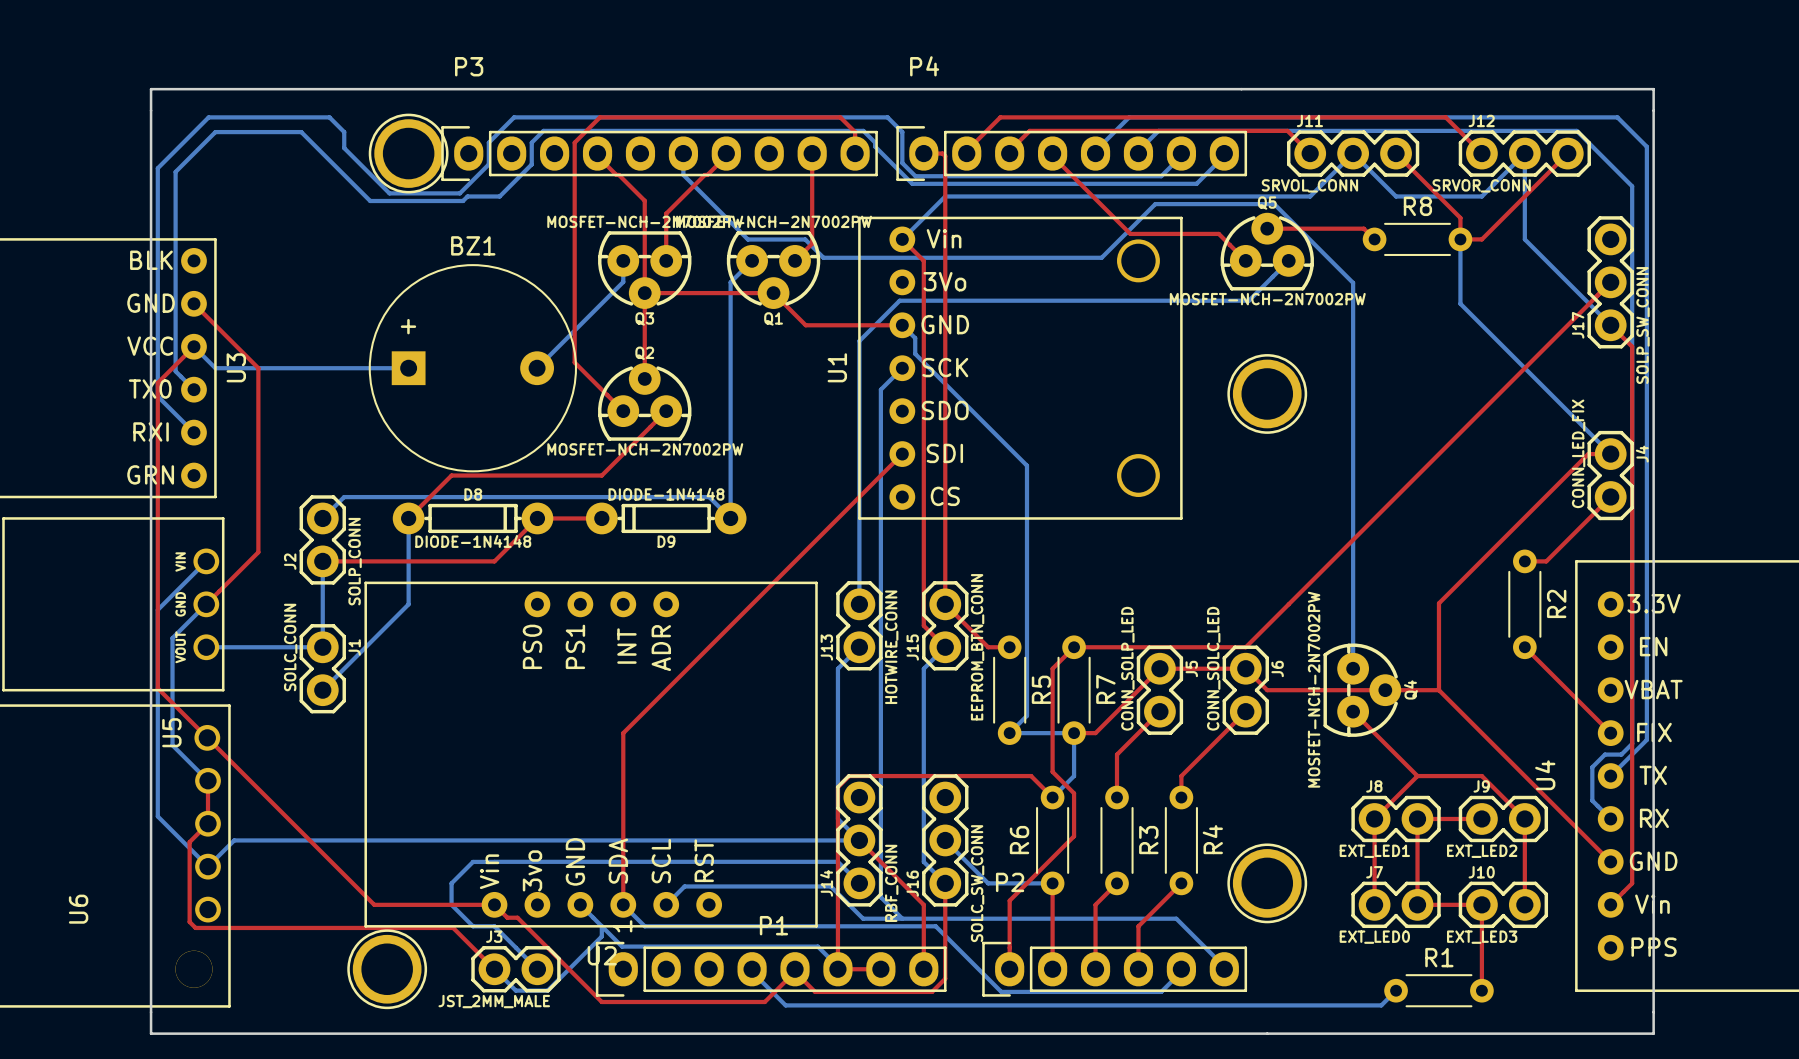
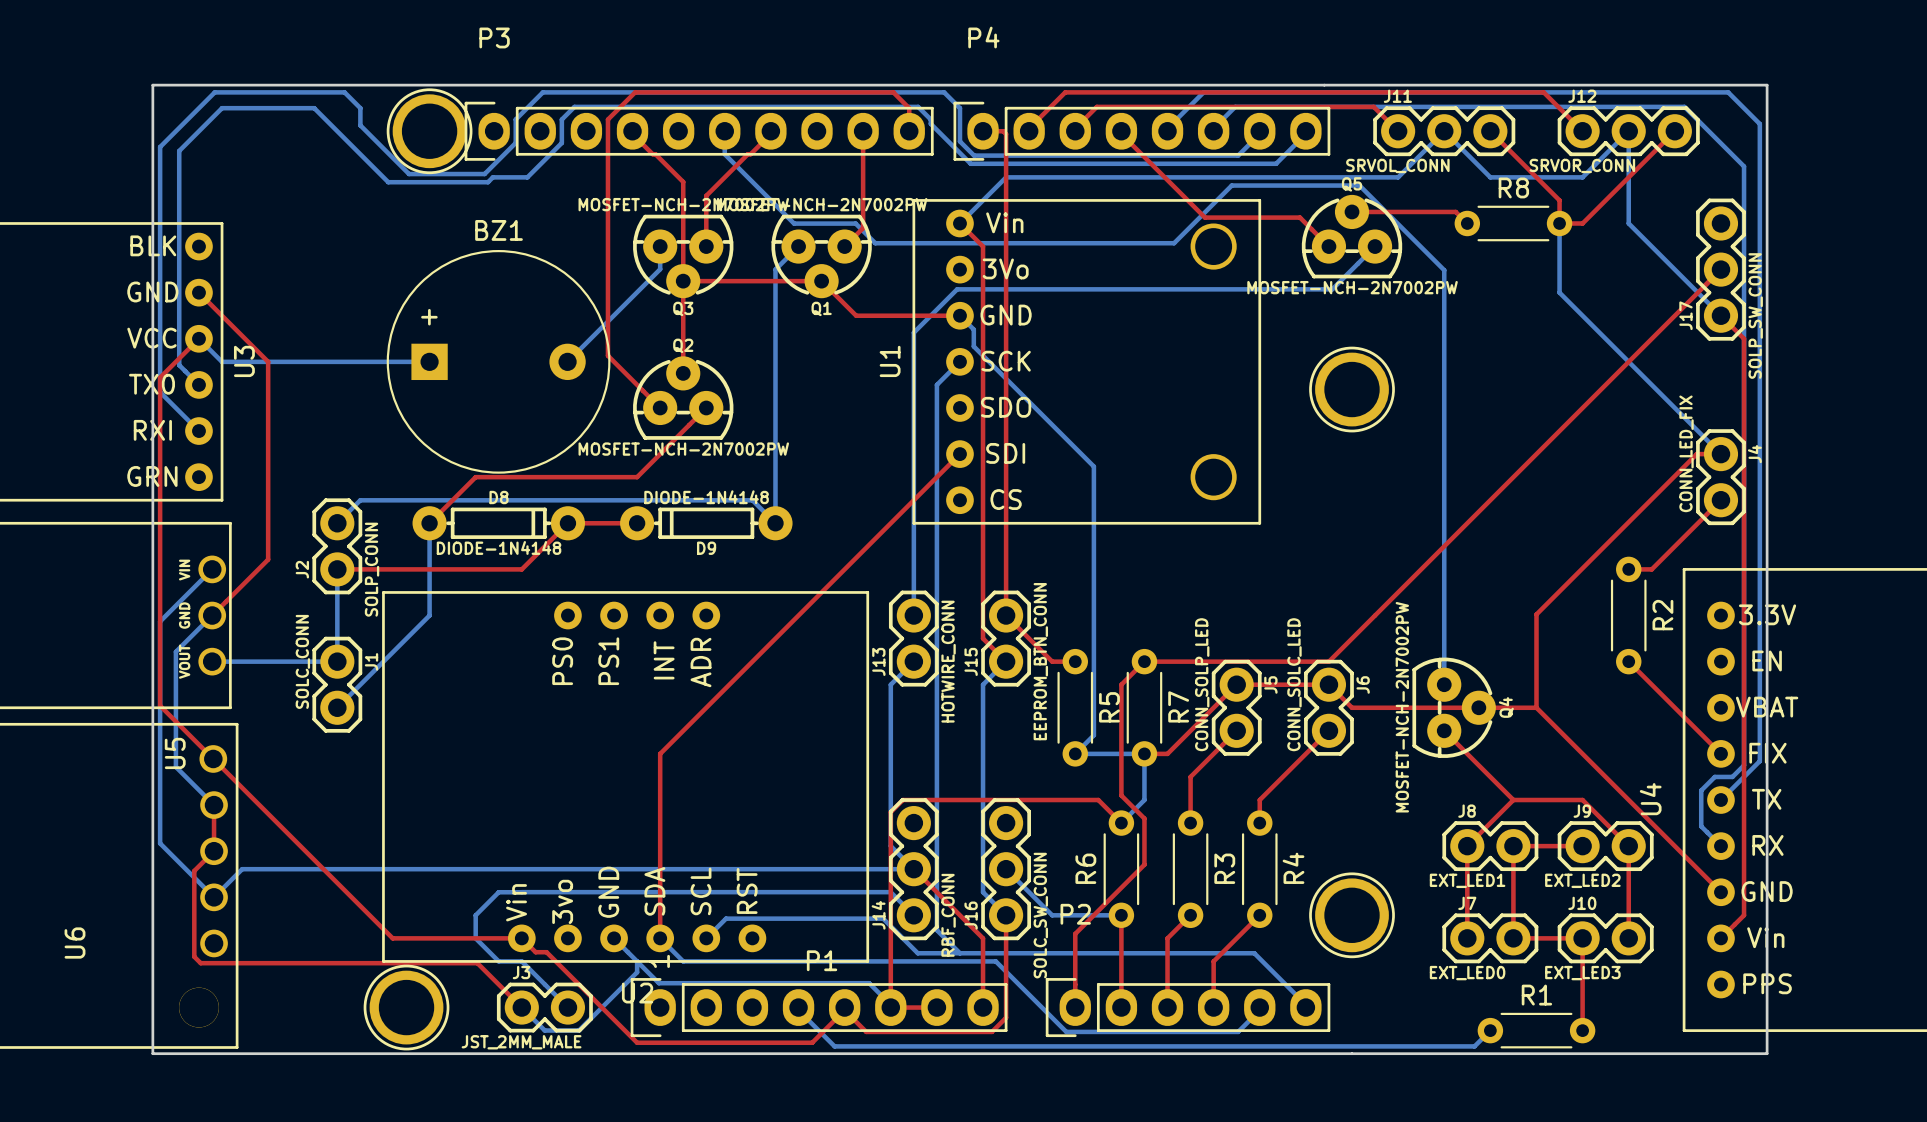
board edge: (151, 110) (151, 89) (1653, 89) (1653, 110) -> (152, 85) (1767, 85)
board edge: (151, 1012) (151, 1033) (1653, 1033) (1653, 1012) -> (152, 1053) (1767, 1053)

